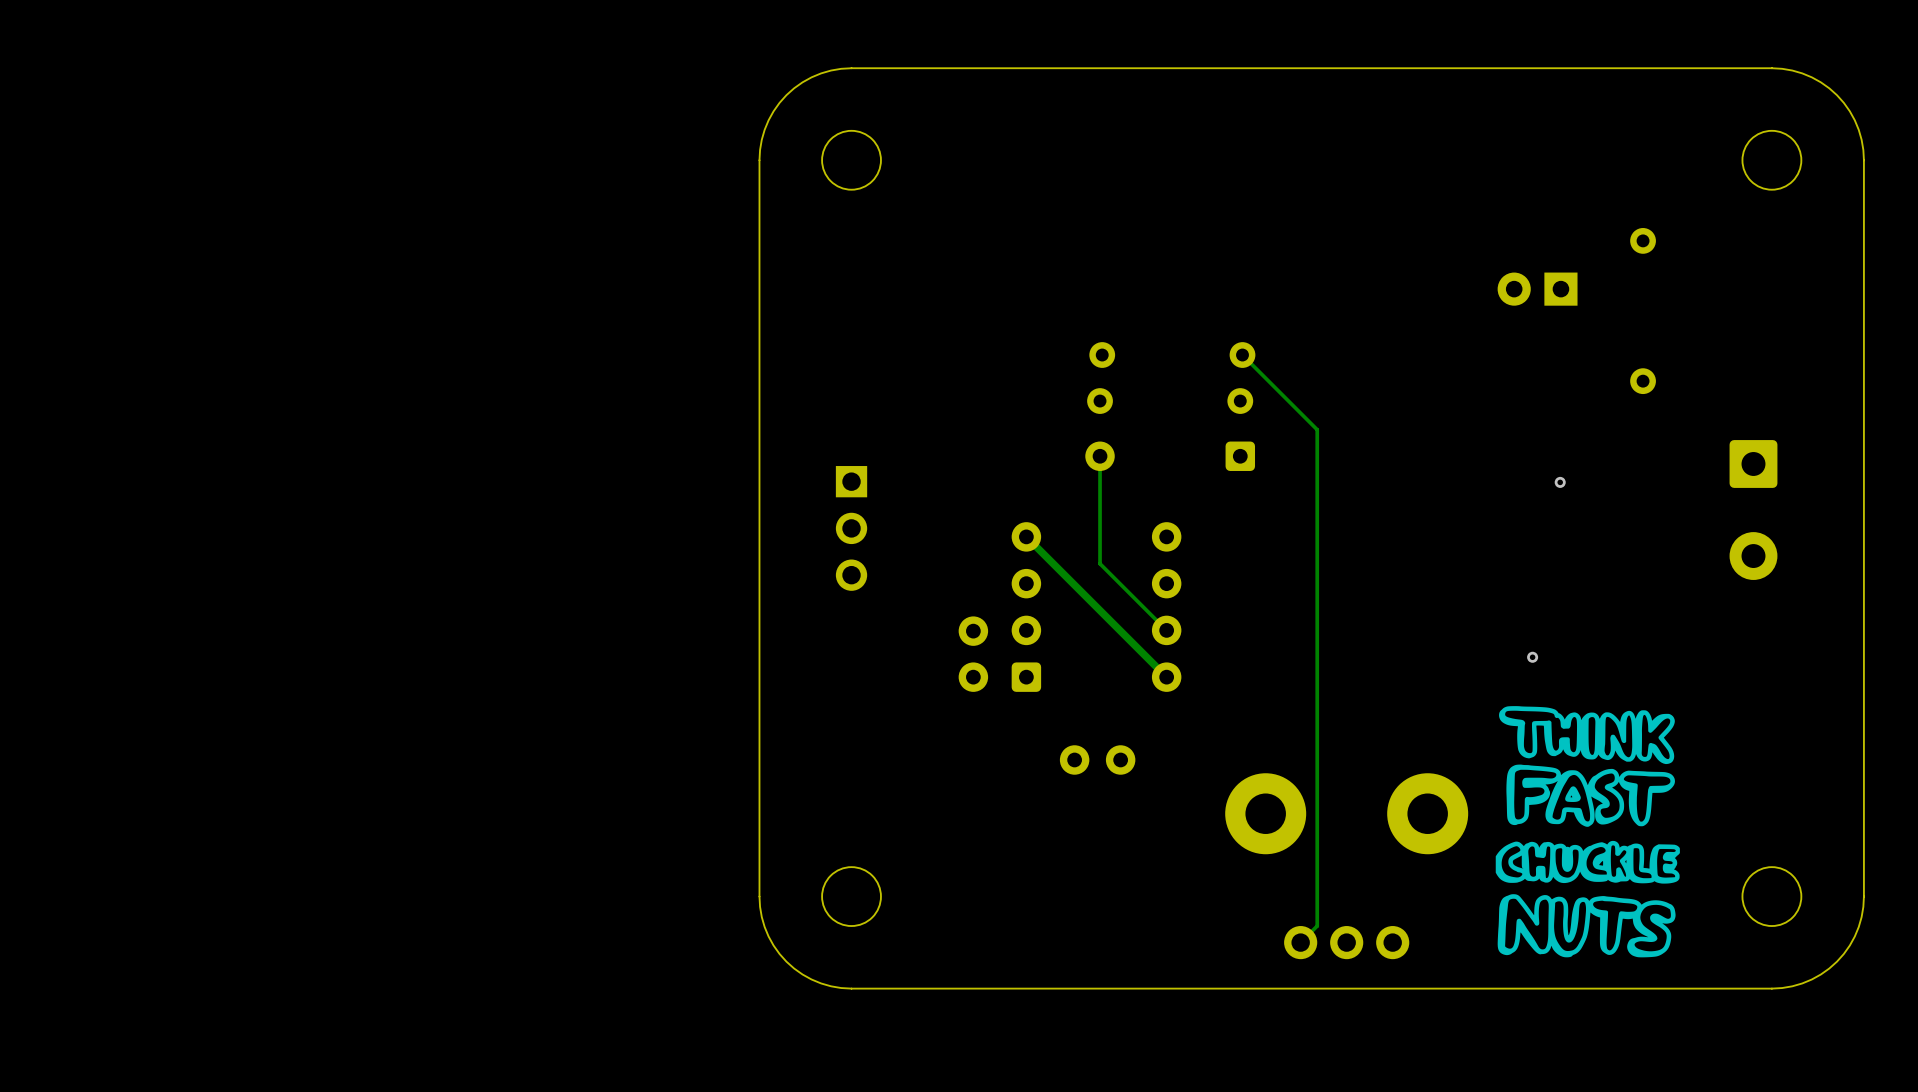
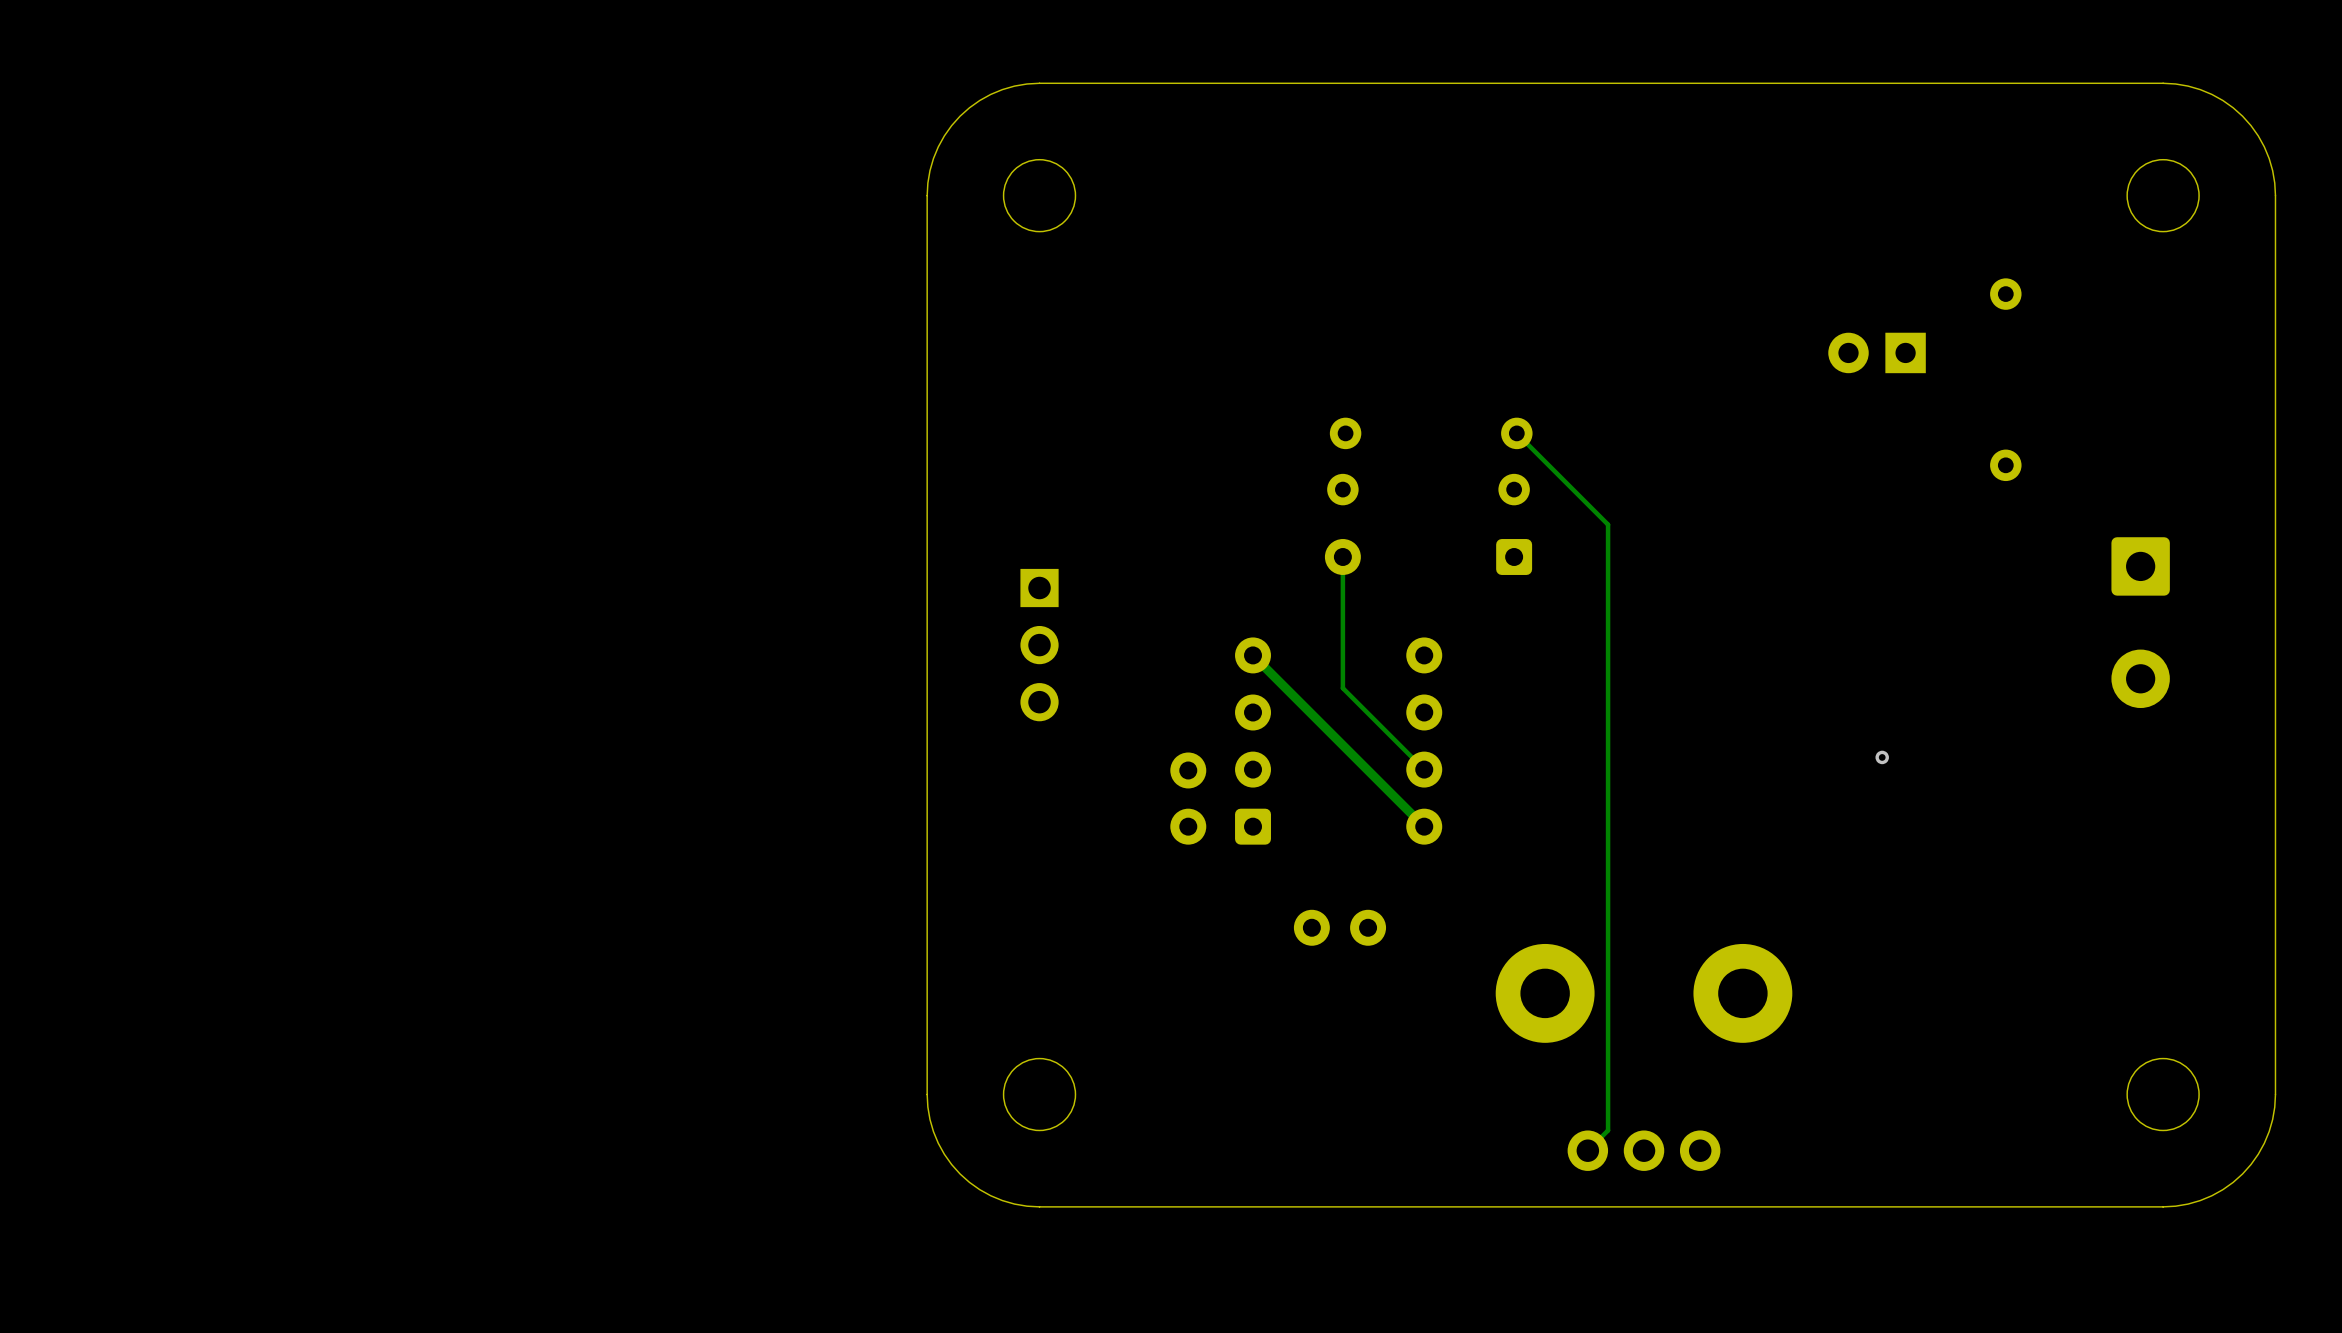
via: (1560, 482) -> none
via position: (1532, 657) -> (1882, 757)
drawing: [1495, 706, 1680, 958] -> none

